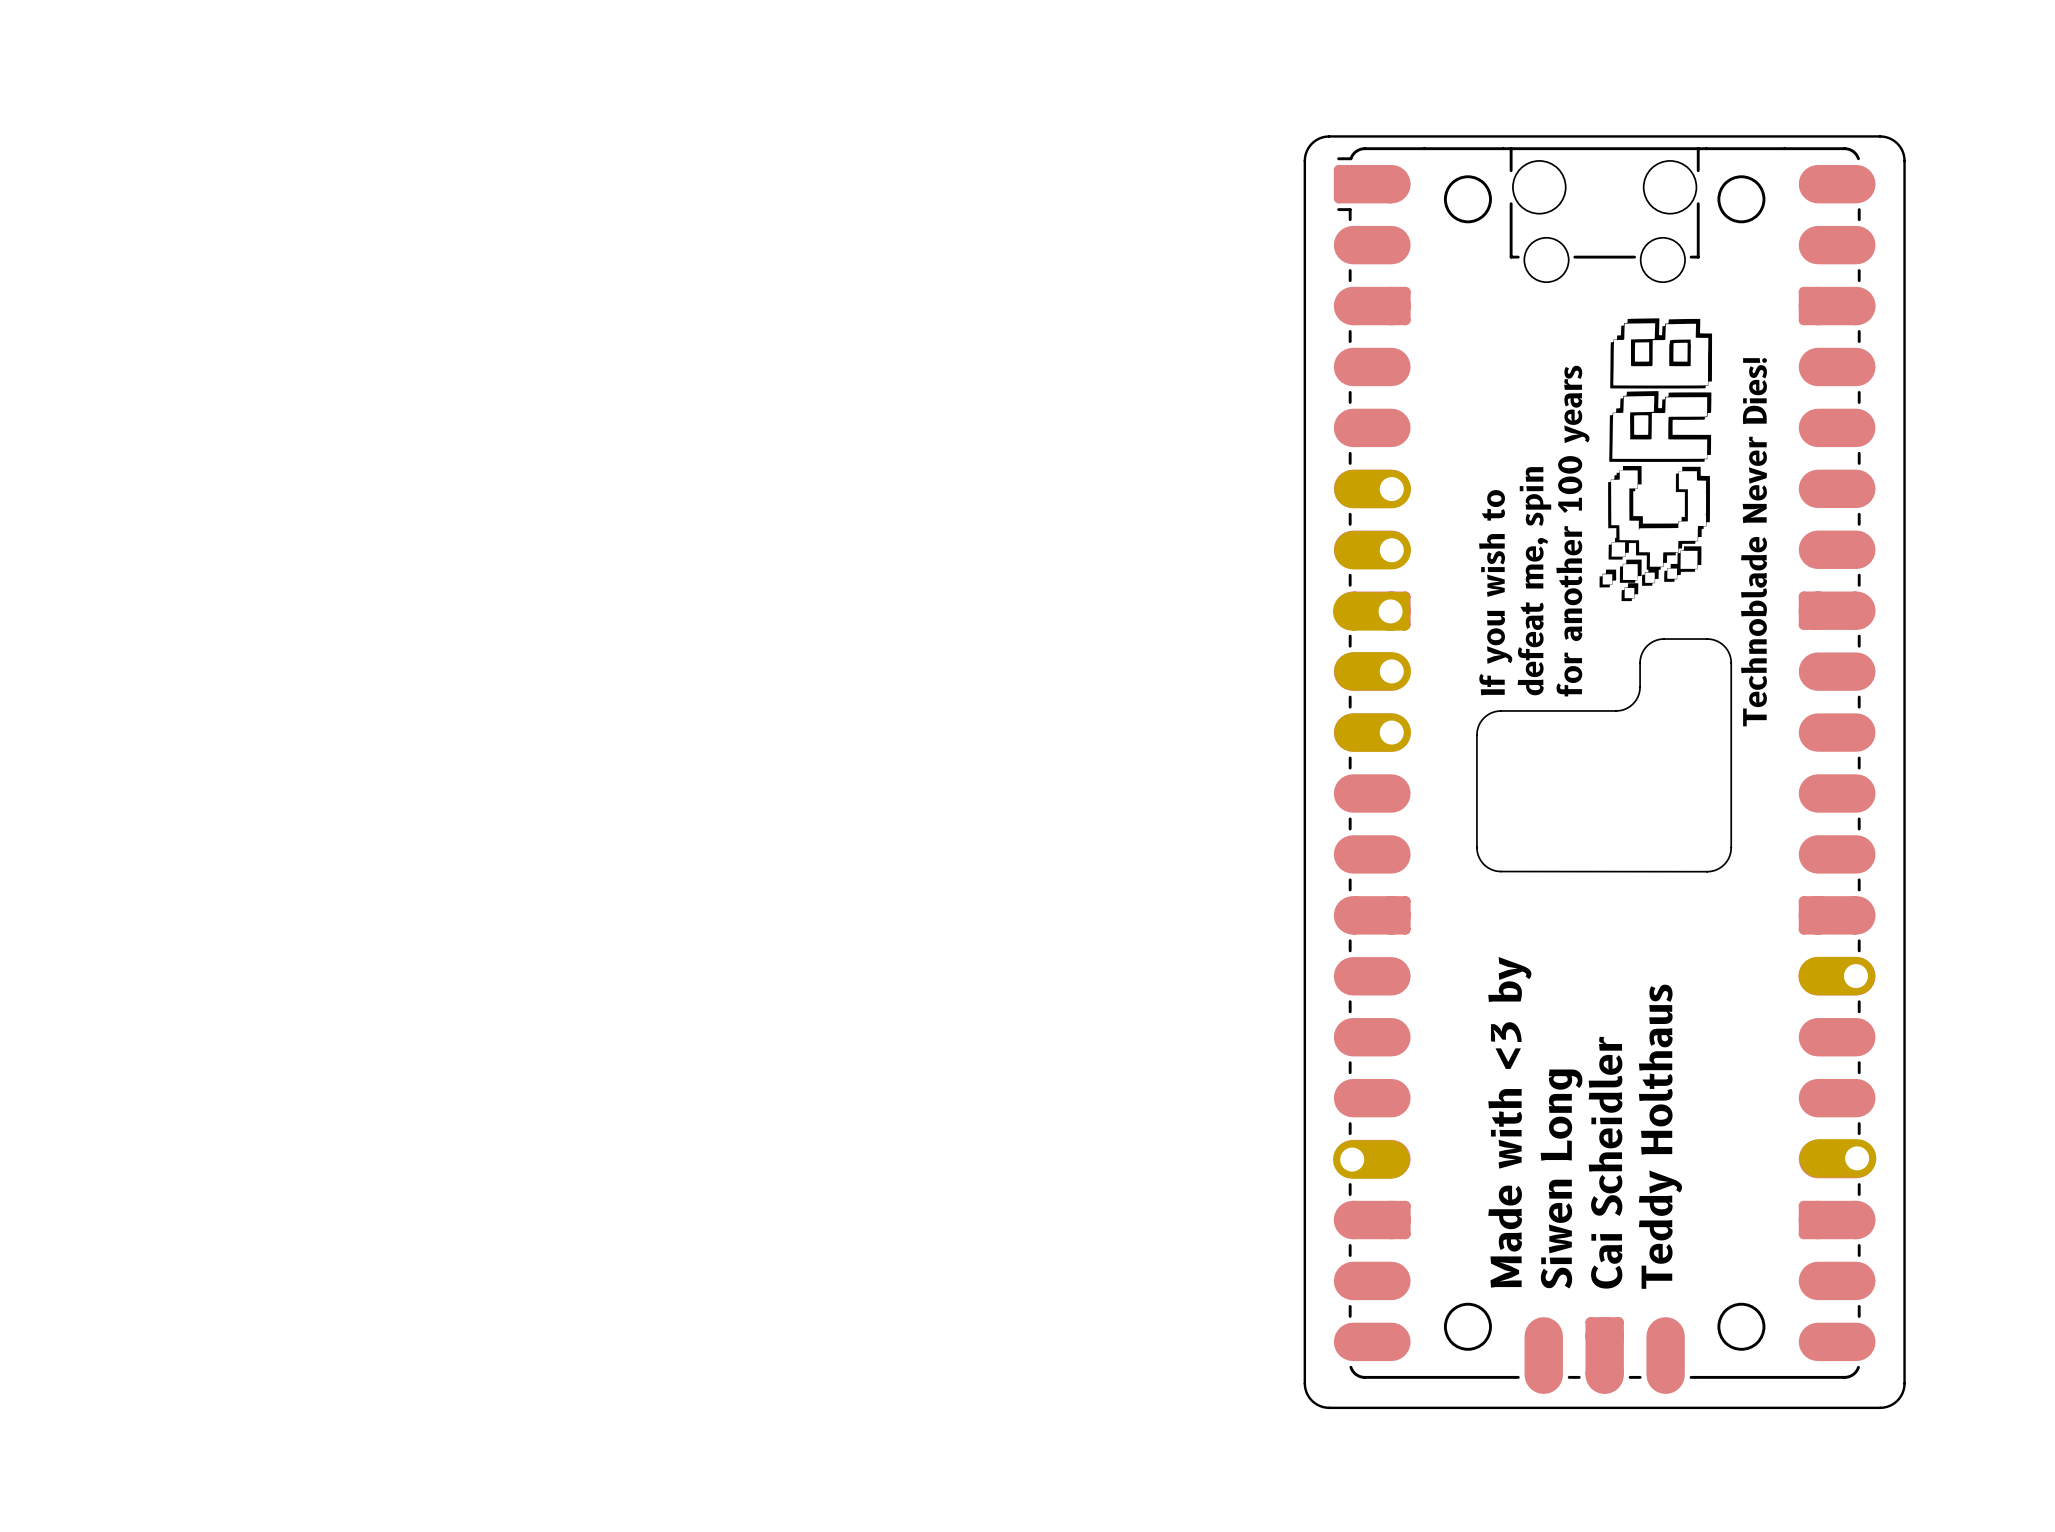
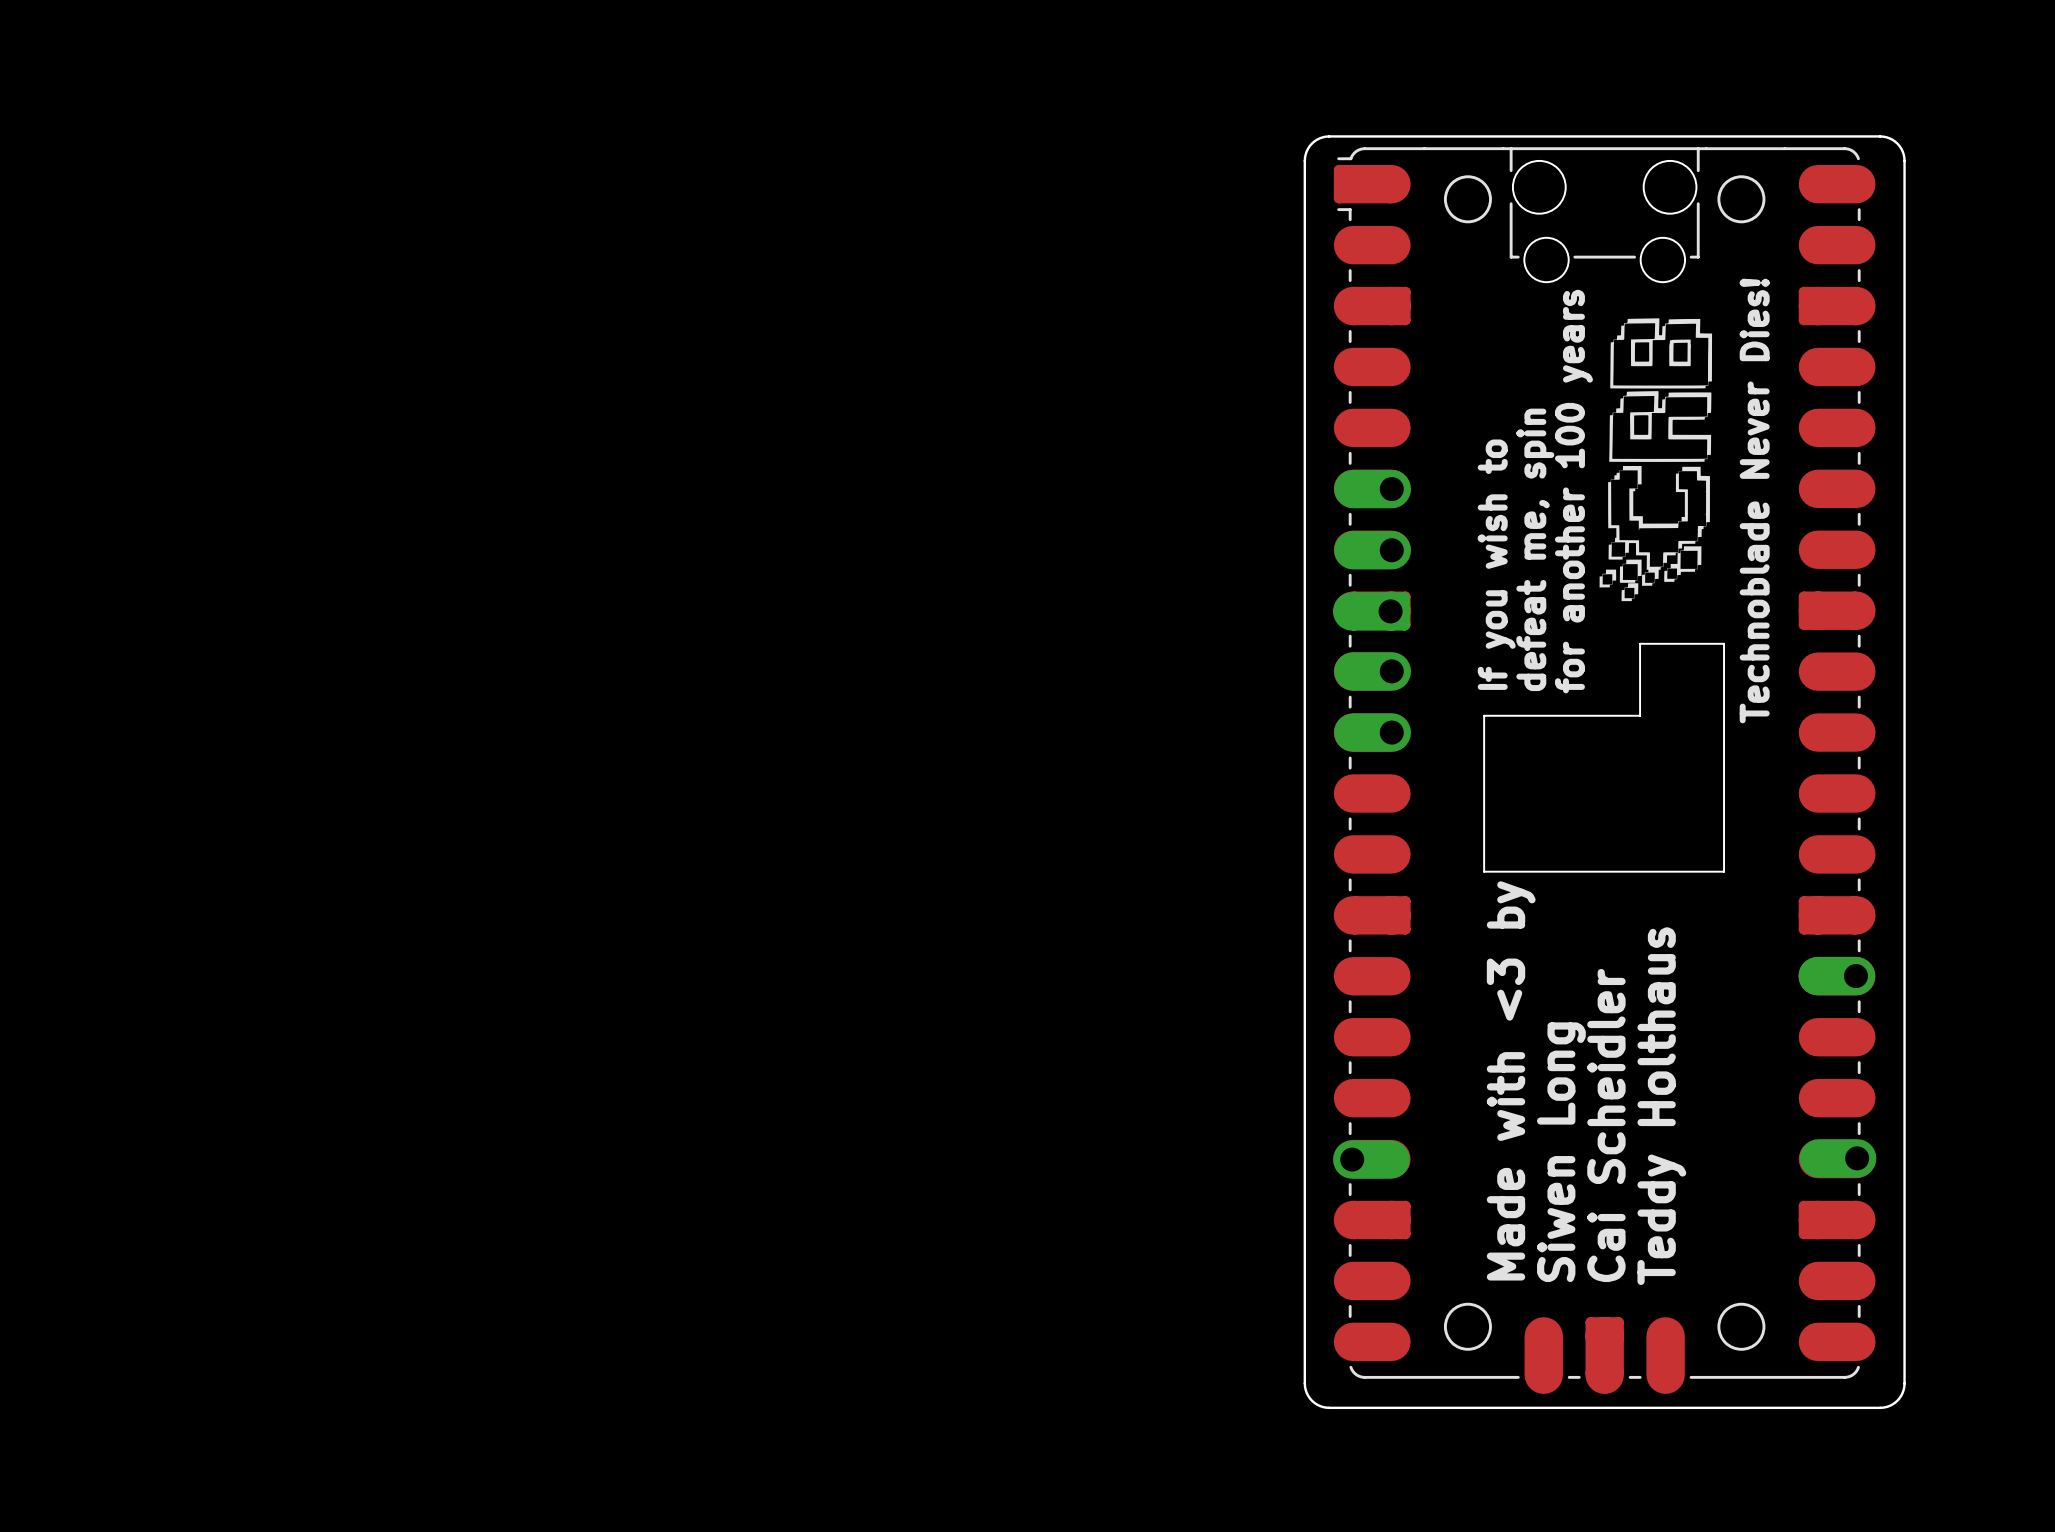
part footprint: [1476, 638, 1732, 873] -> [1483, 643, 1725, 873]

